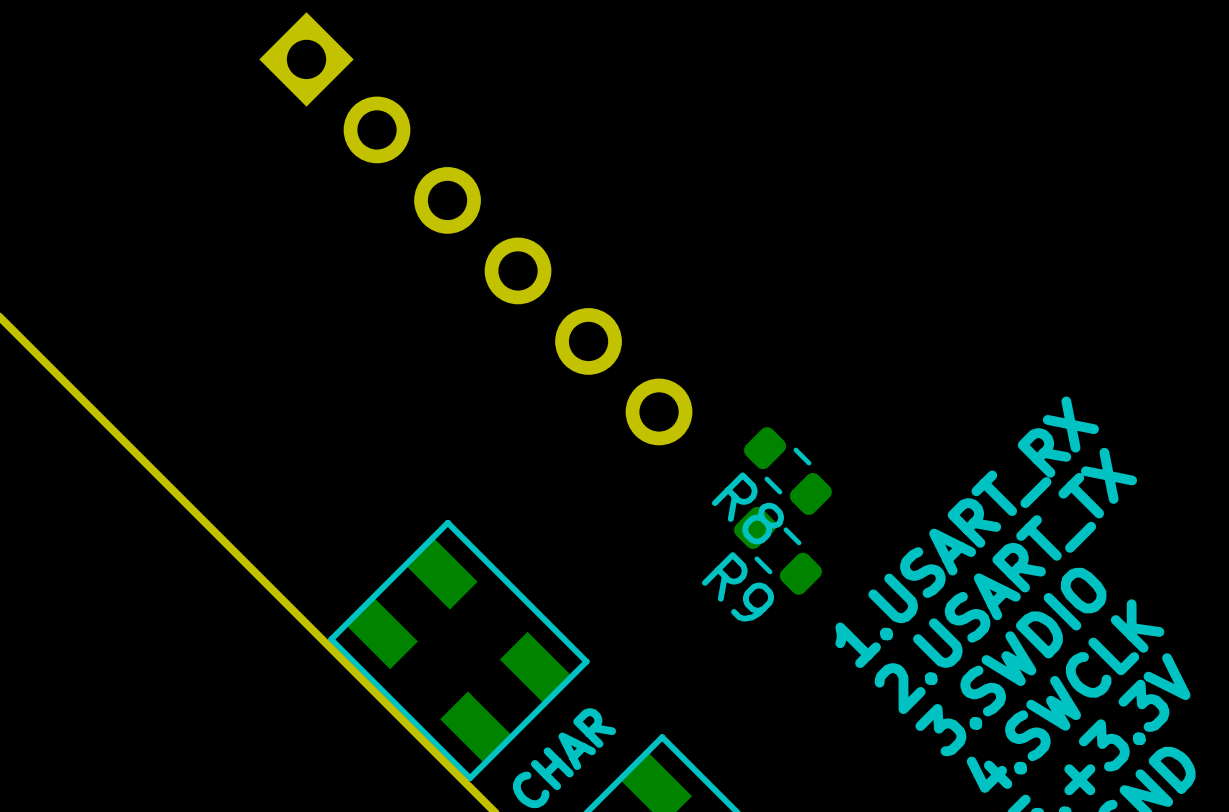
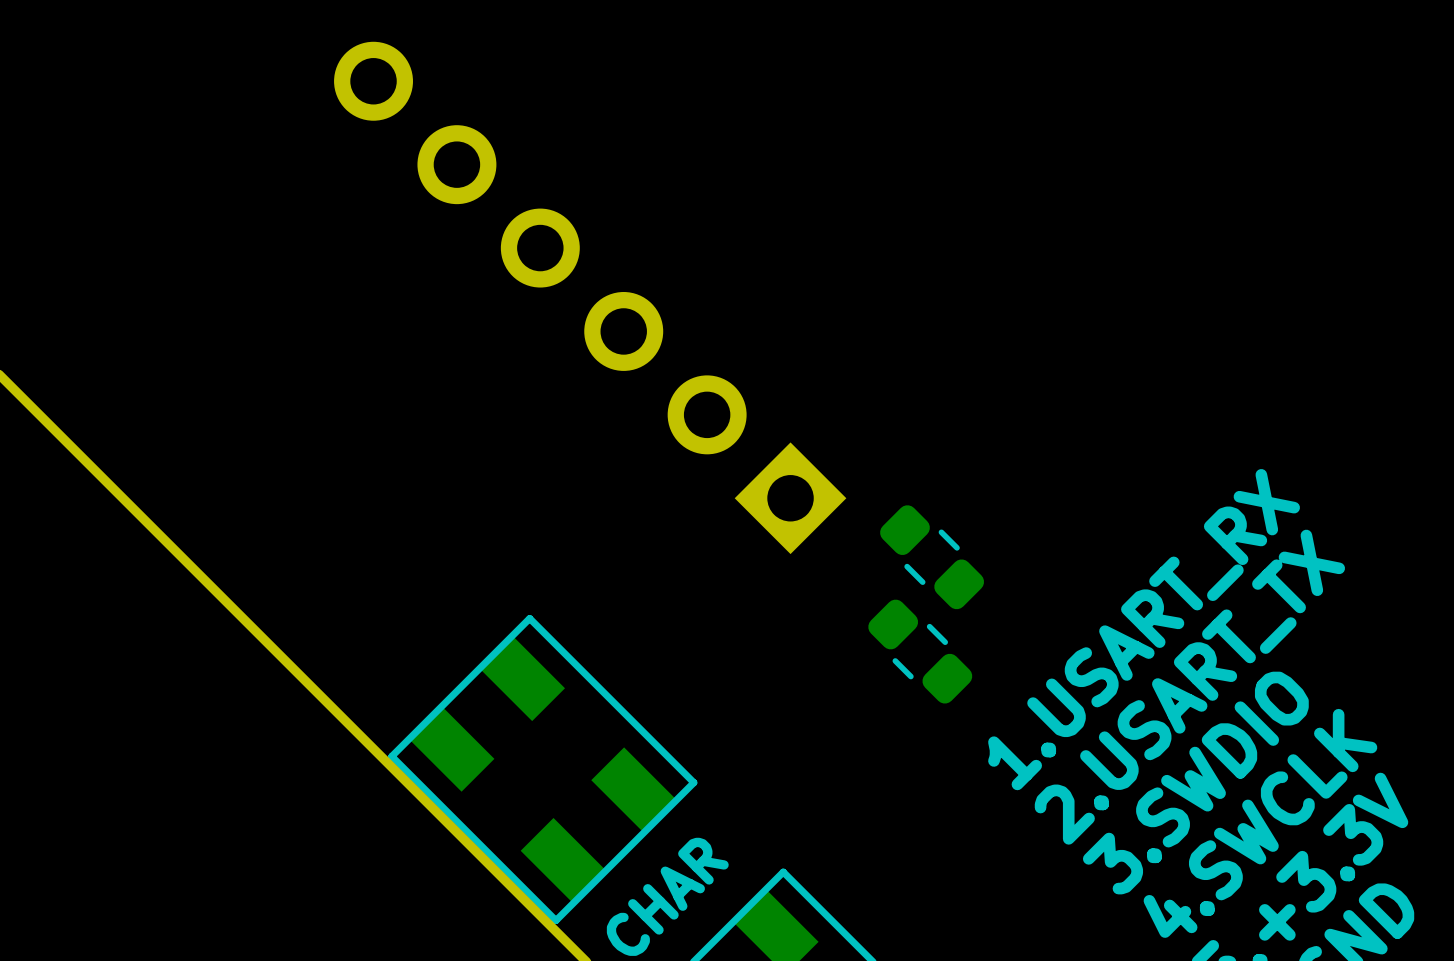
part rotation: 0° (475, 228) -> 180° (590, 297)
R8 name: R8 (747, 508) -> none
R9 name: R9 (738, 586) -> none

